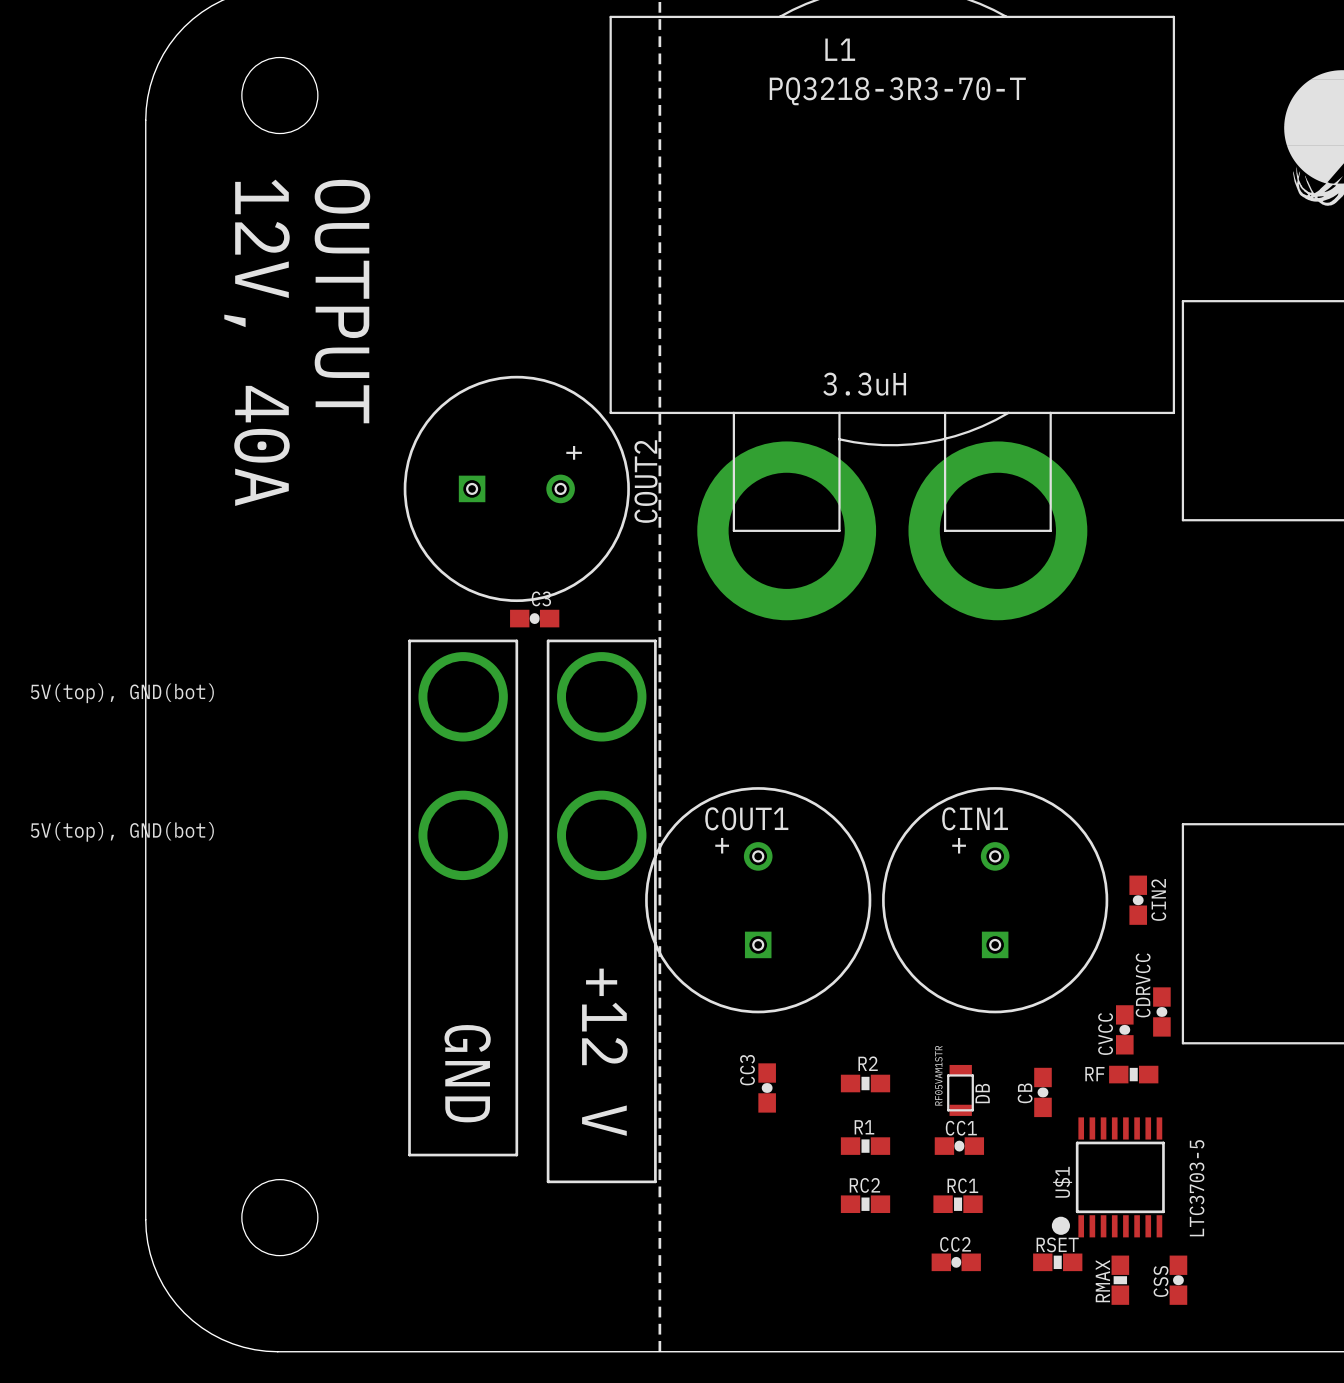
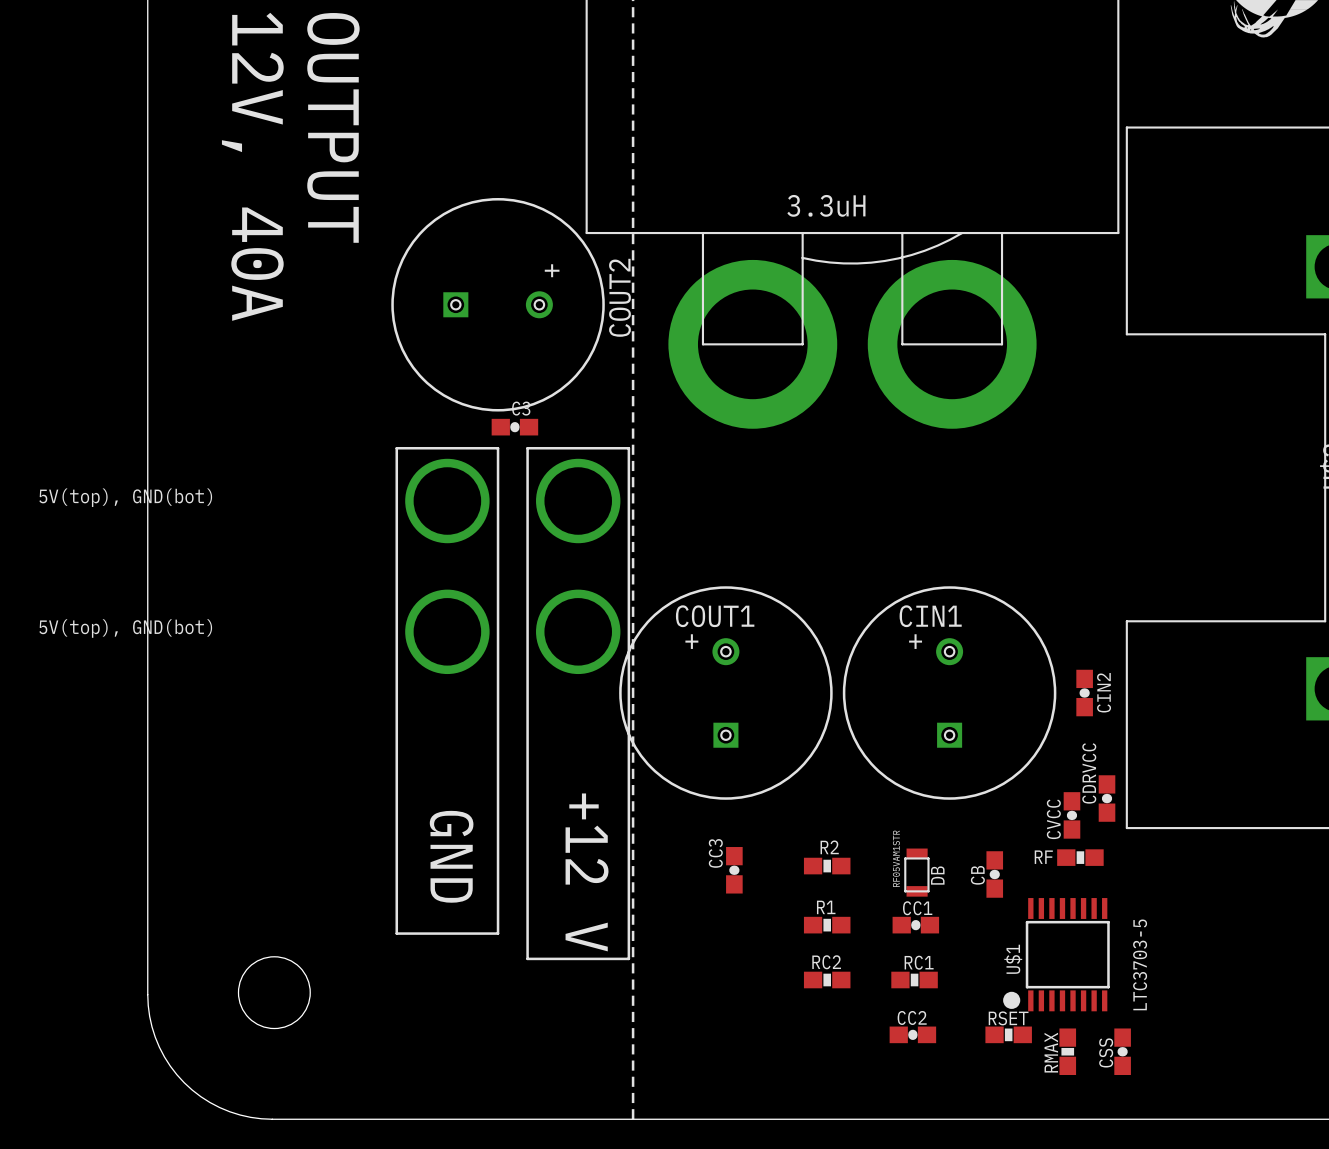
text position: +12 V (604, 1052) -> +12 V (587, 872)

